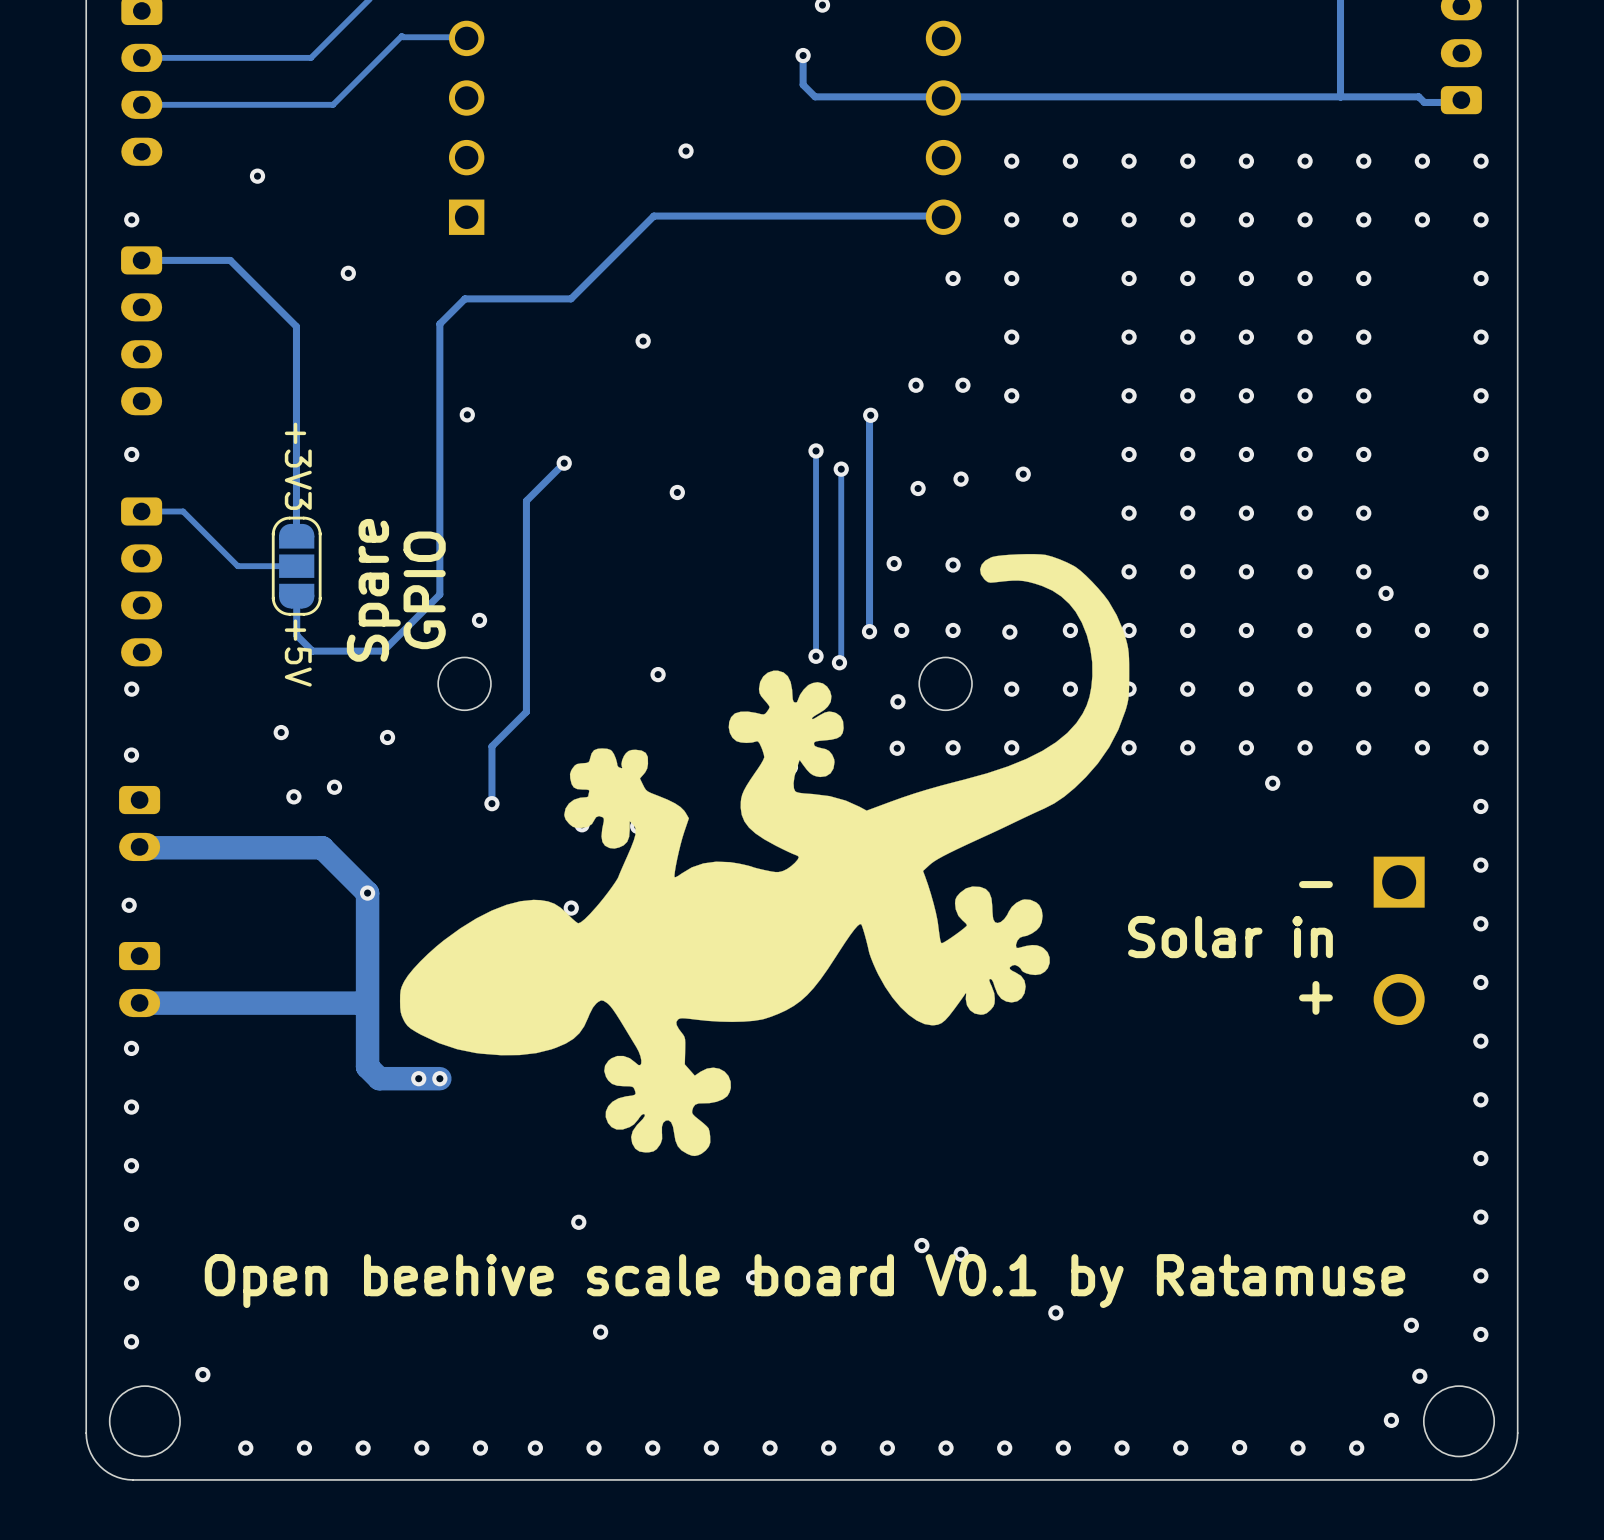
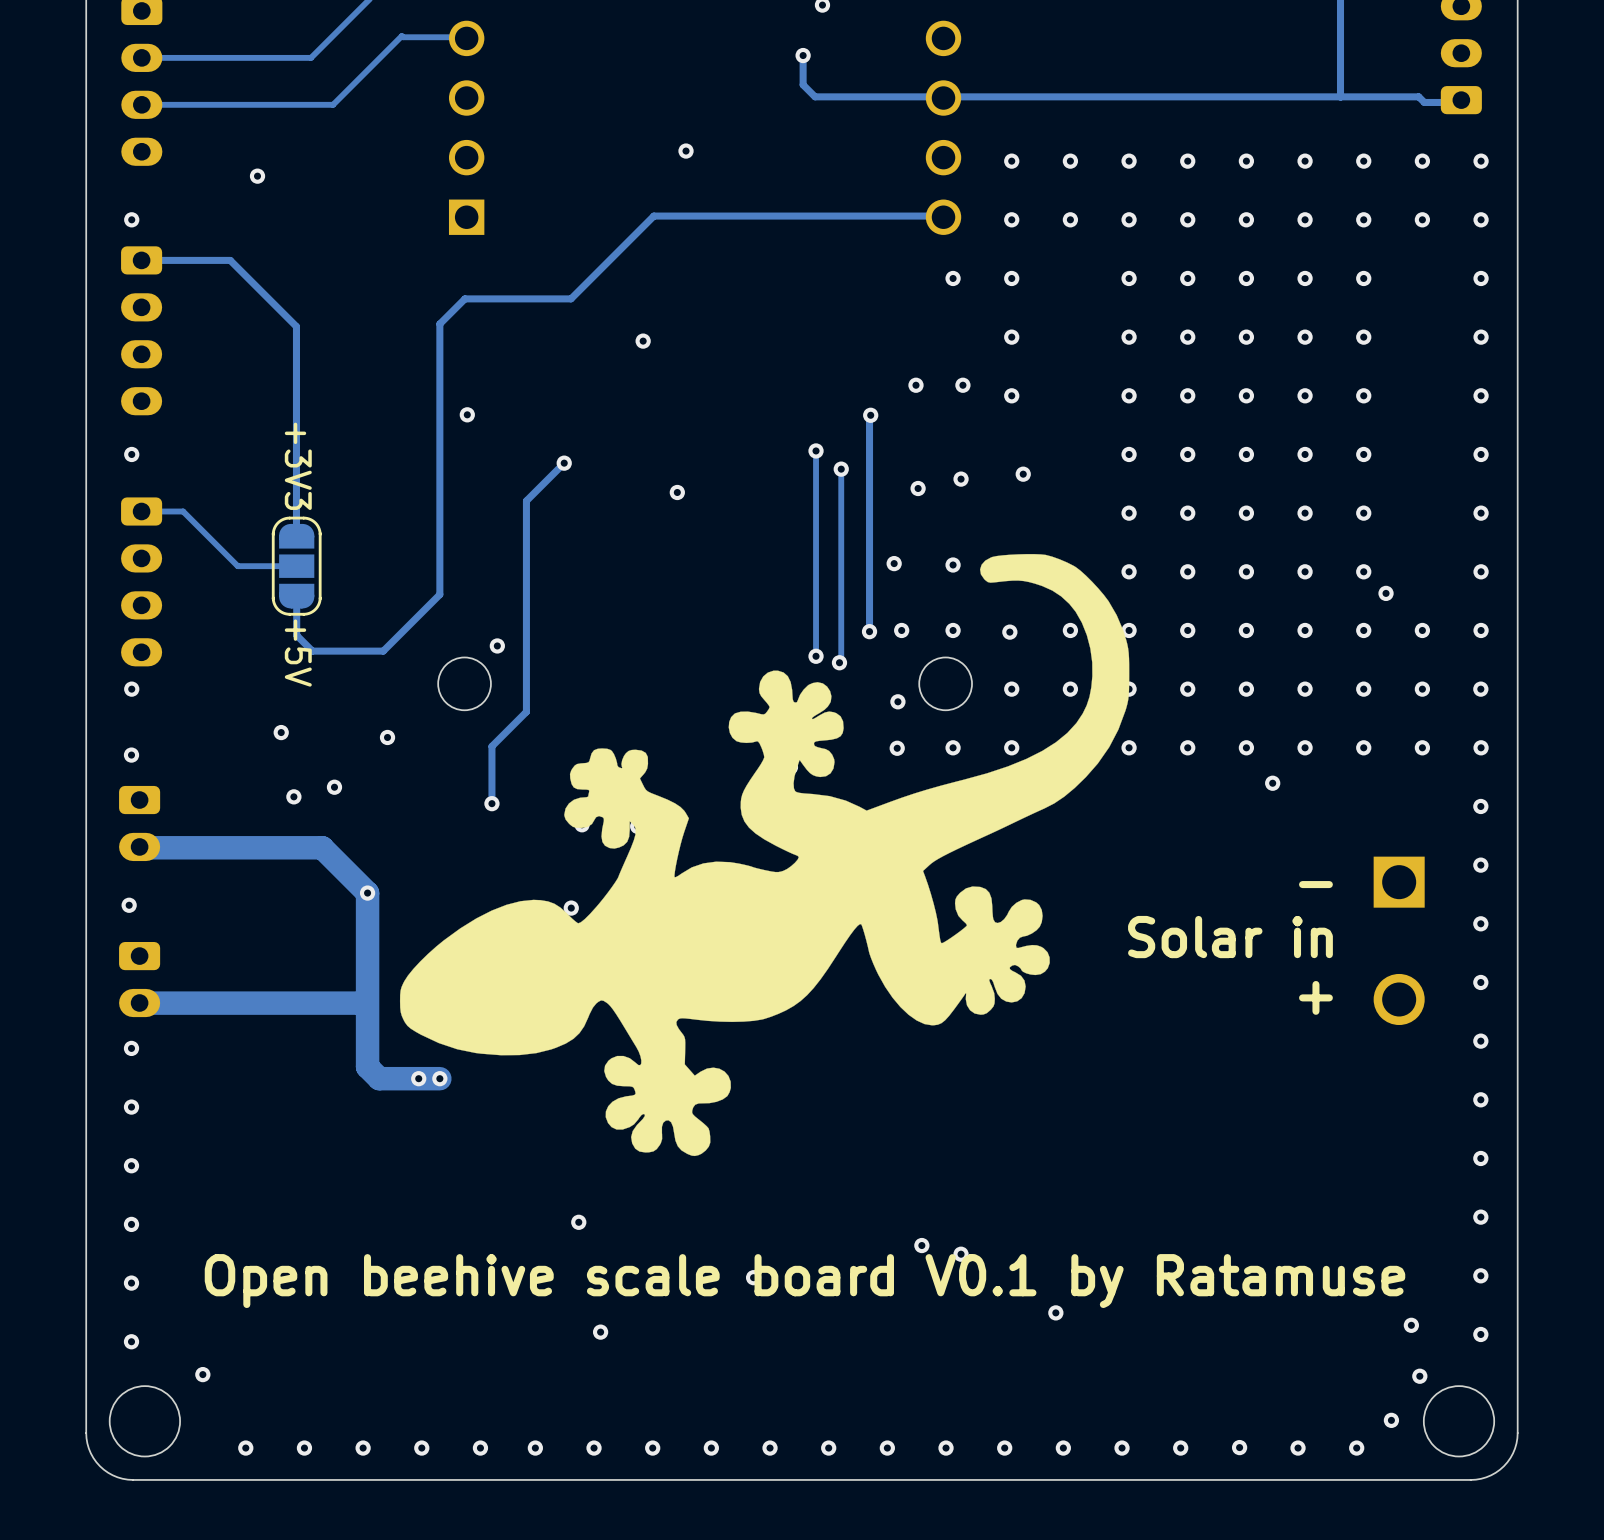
via: (348, 273) -> none
text: Spare (373, 590) -> none
text: GPIO (424, 590) -> none
via position: (479, 620) -> (497, 645)
via: (658, 674) -> none

